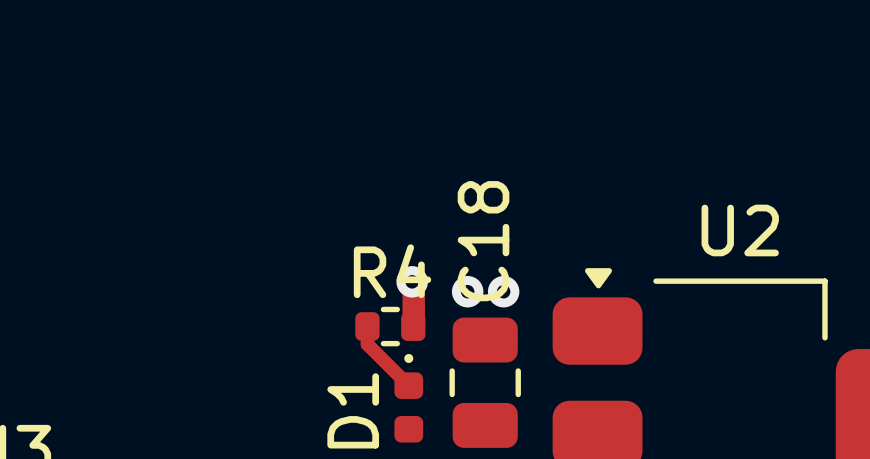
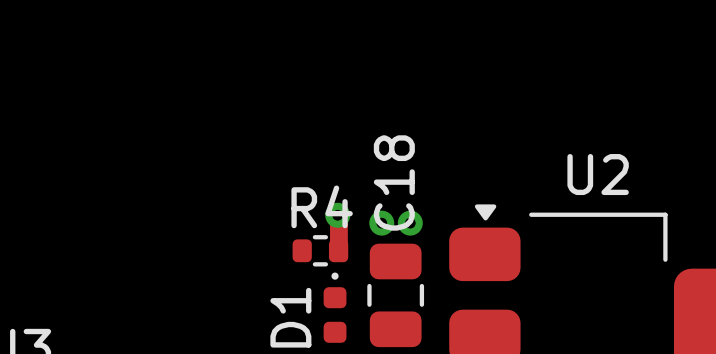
top track: (367, 326) (367, 344) (408, 385) -> none

